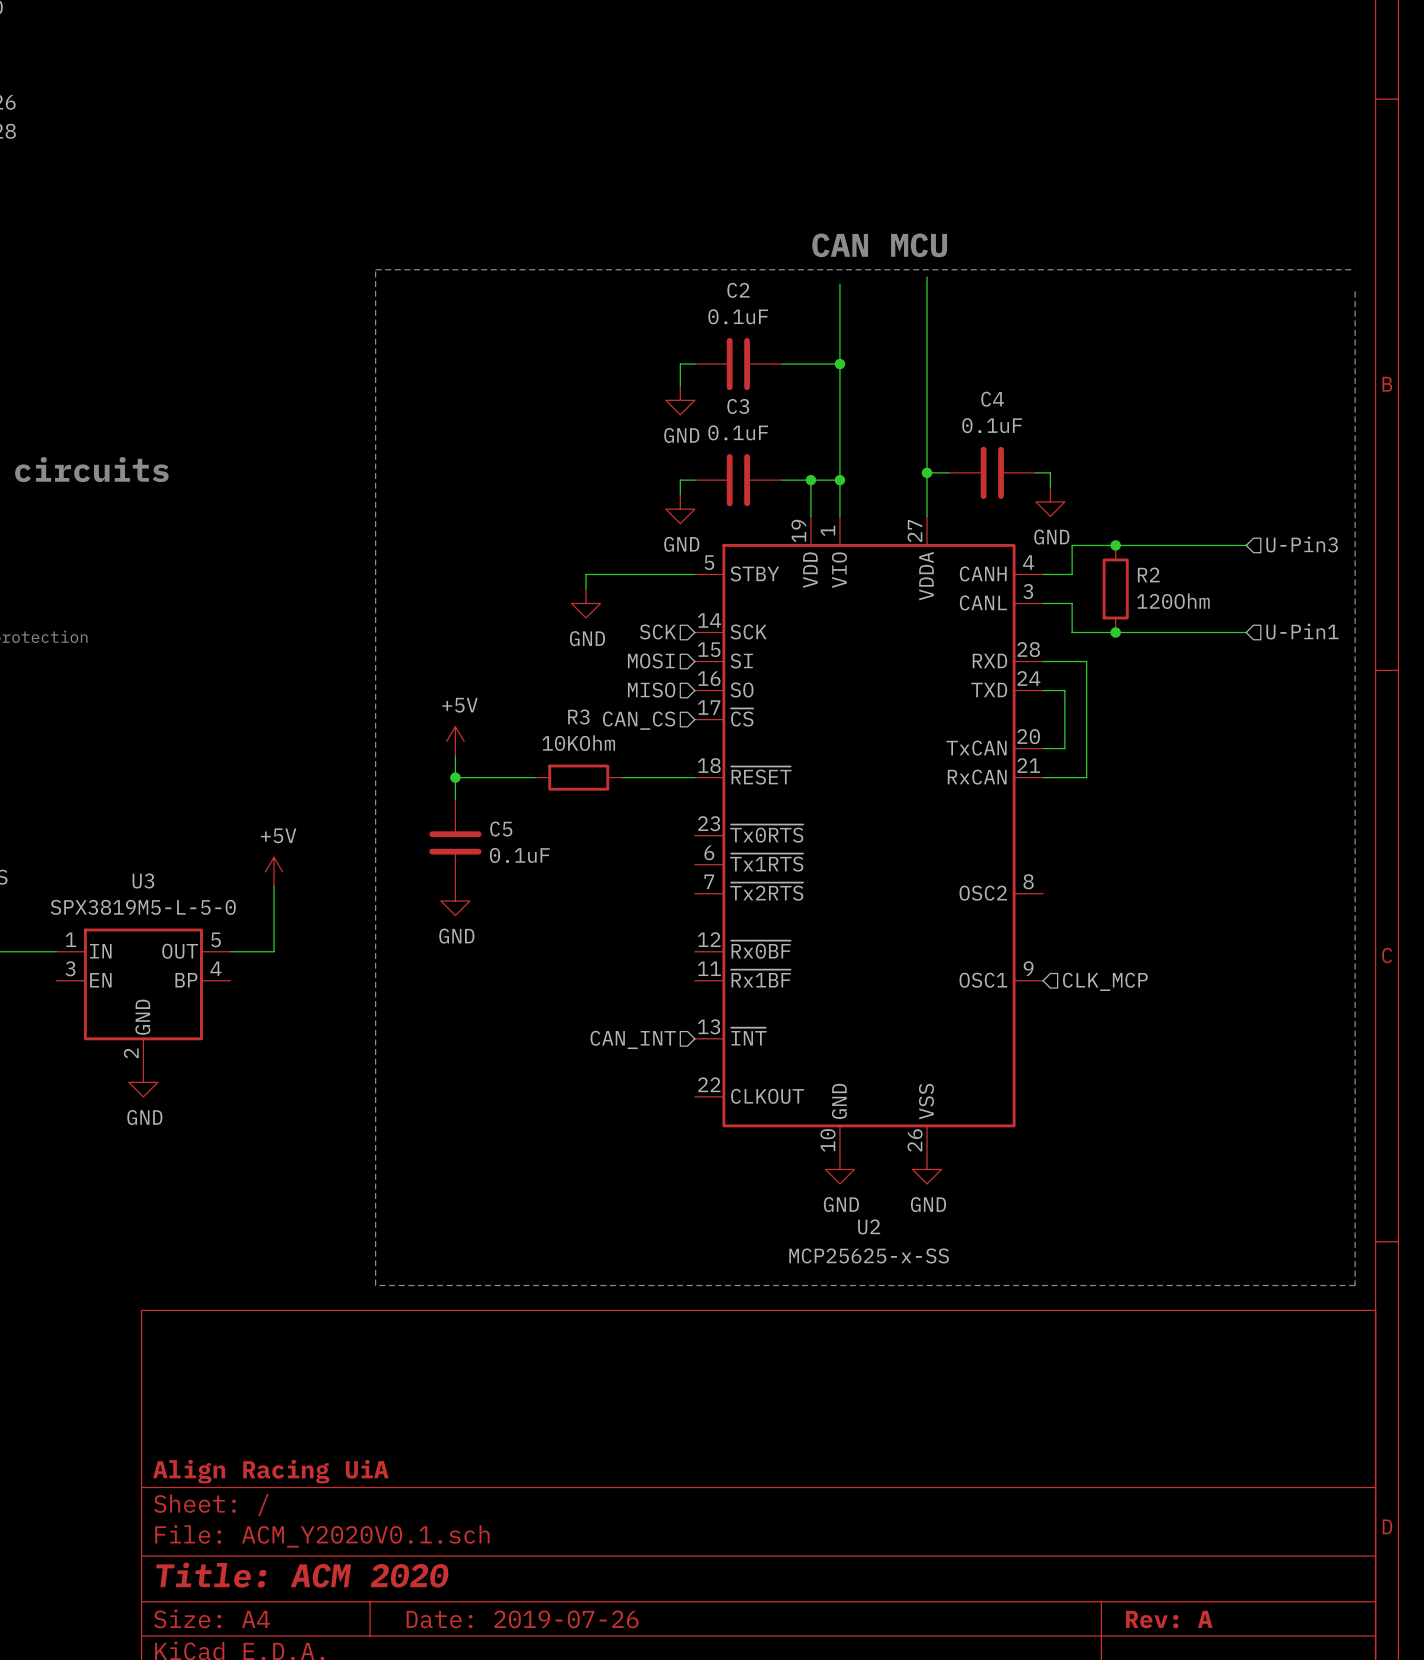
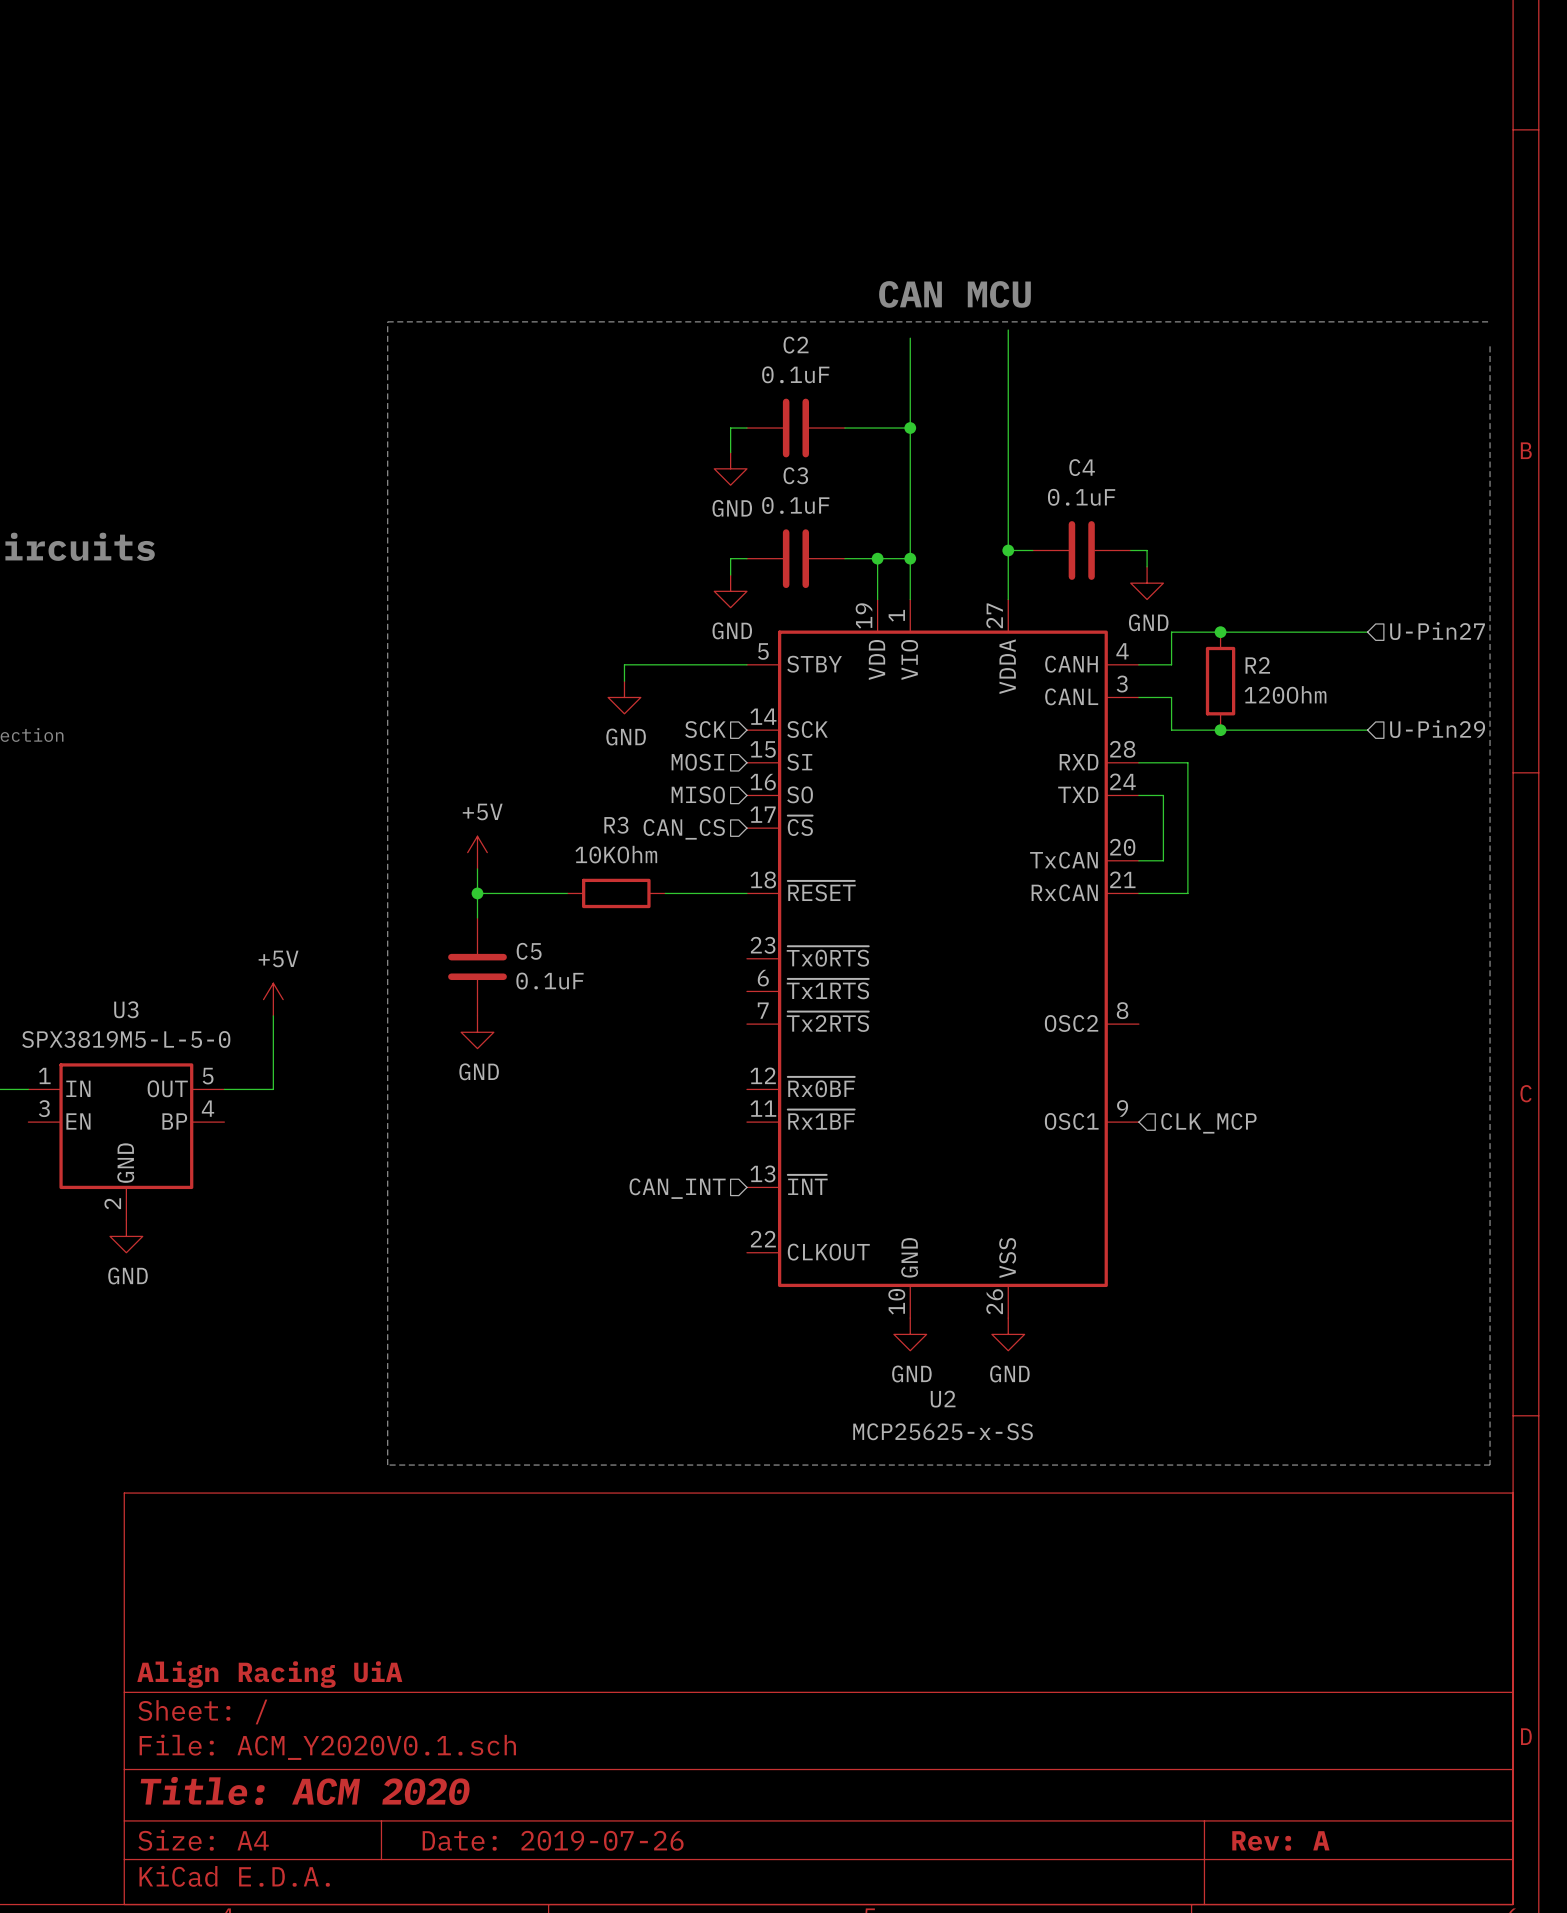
hierarchical label: U-Pin3 (1302, 544) -> U-Pin27 (1437, 631)
hierarchical label: U-Pin1 (1302, 631) -> U-Pin29 (1437, 729)

